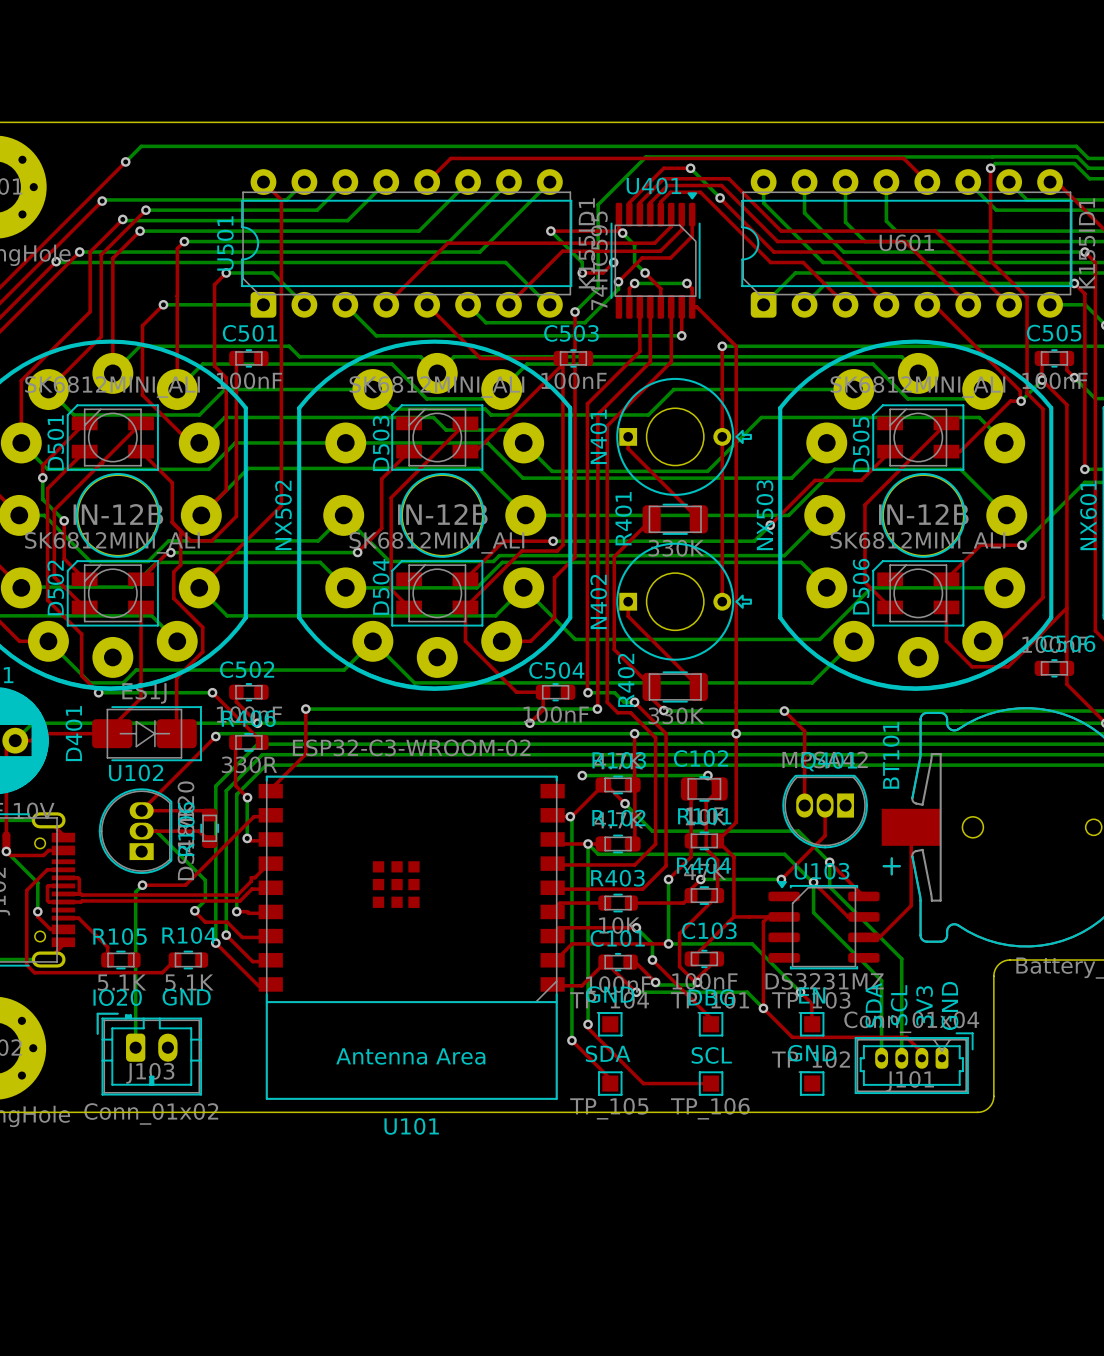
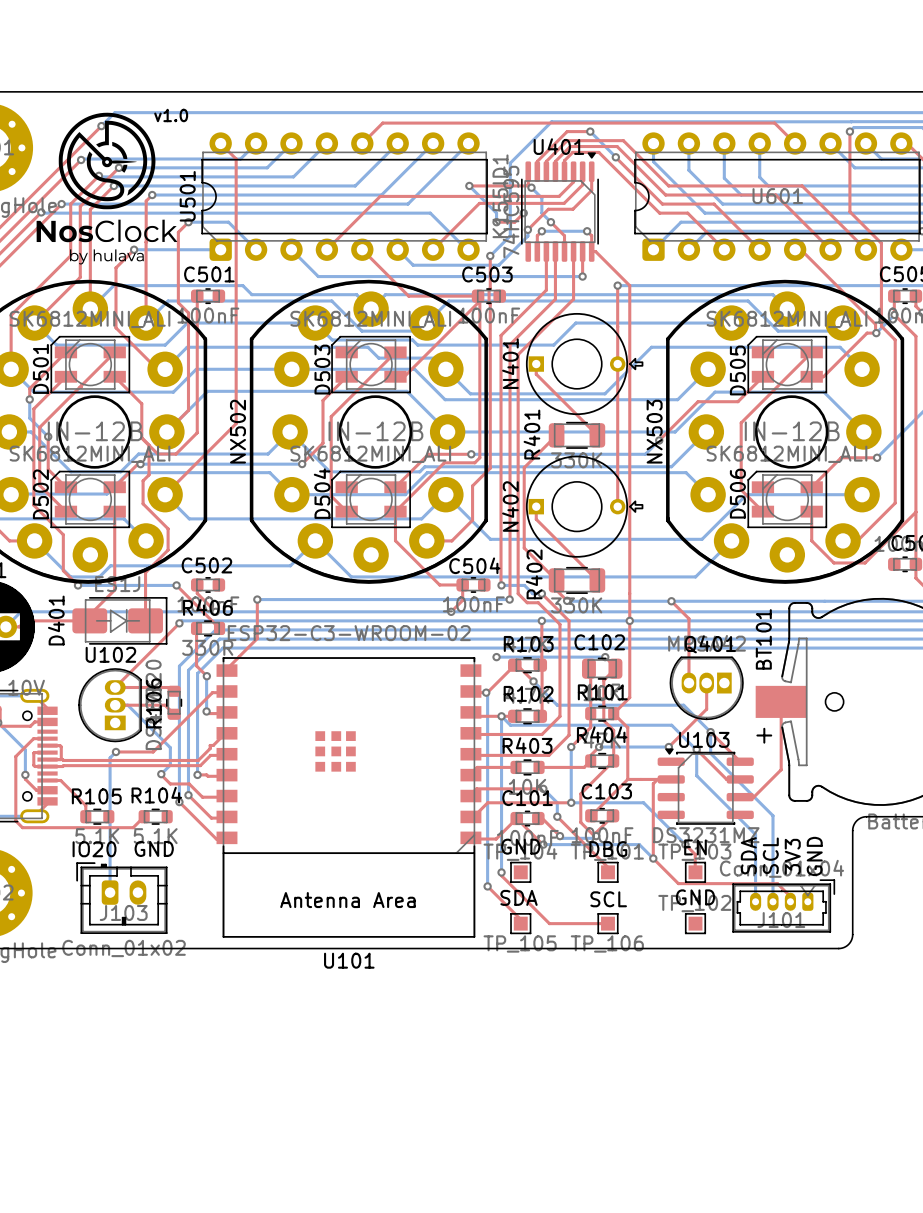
drawing: none -> [36, 112, 178, 265]
text: none -> v1.0 (171, 115)

